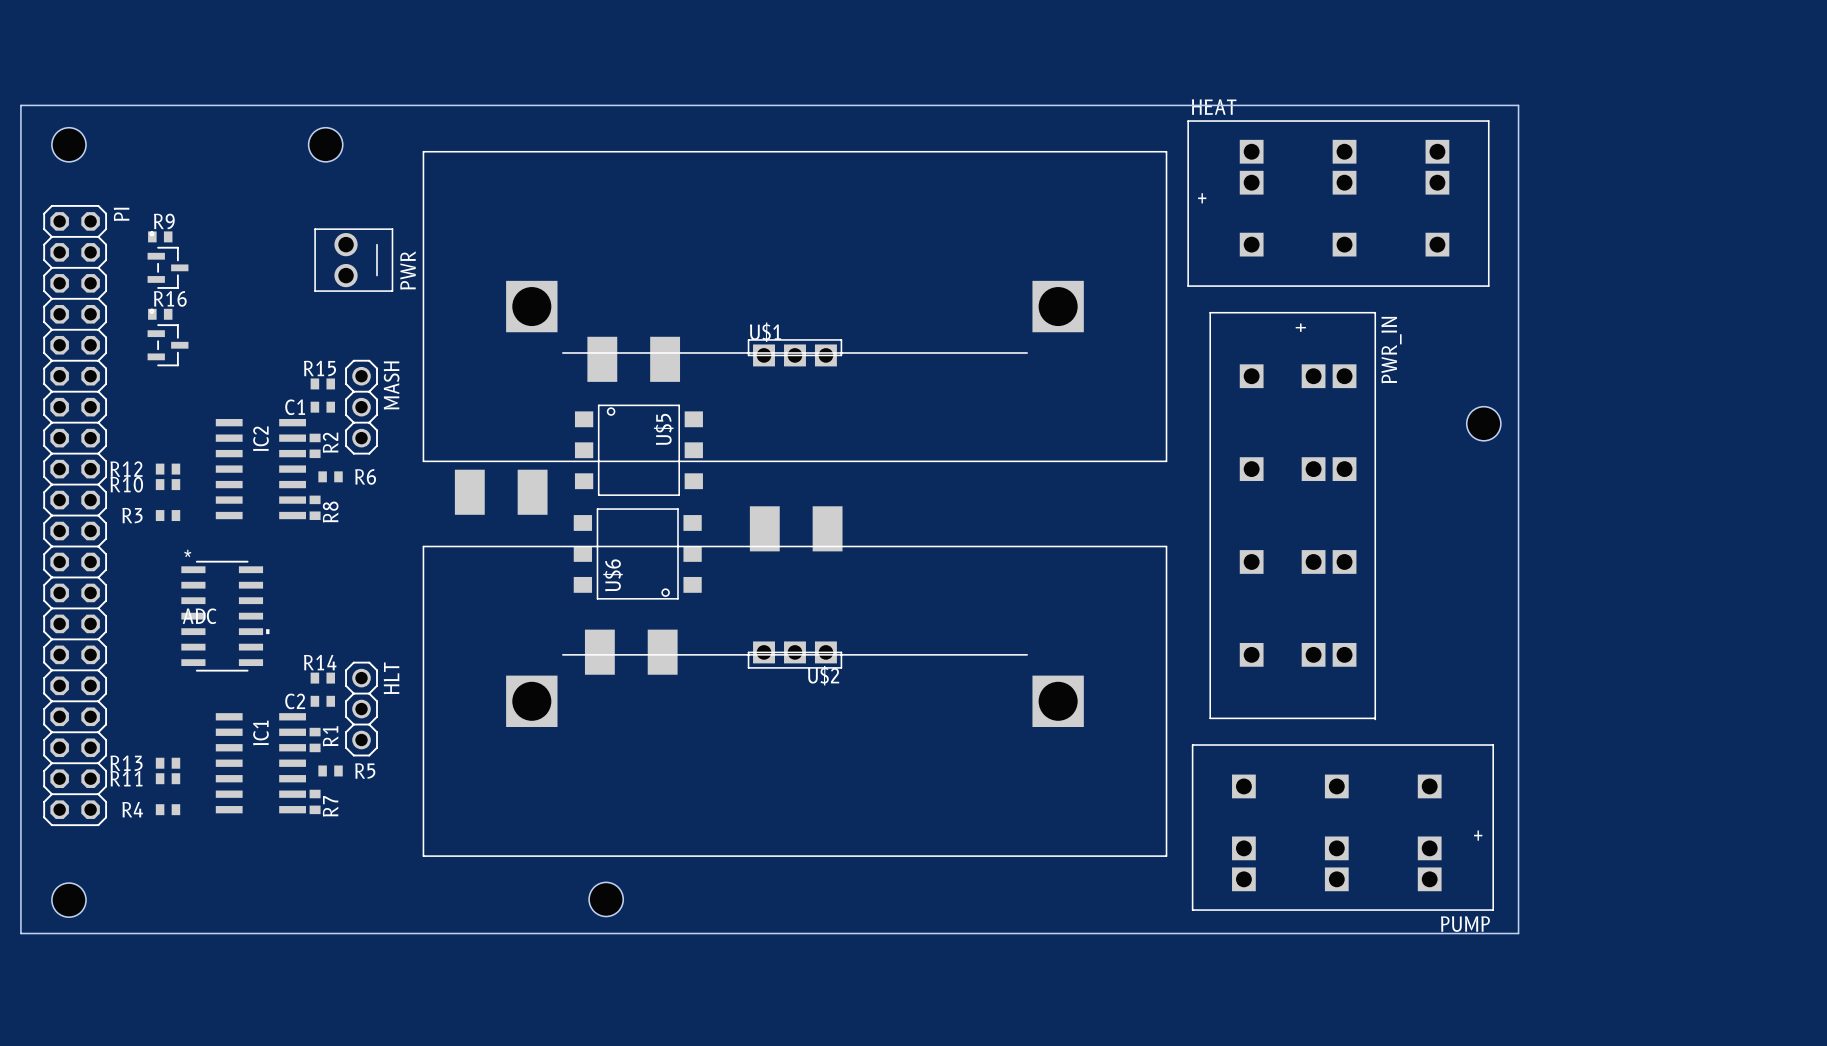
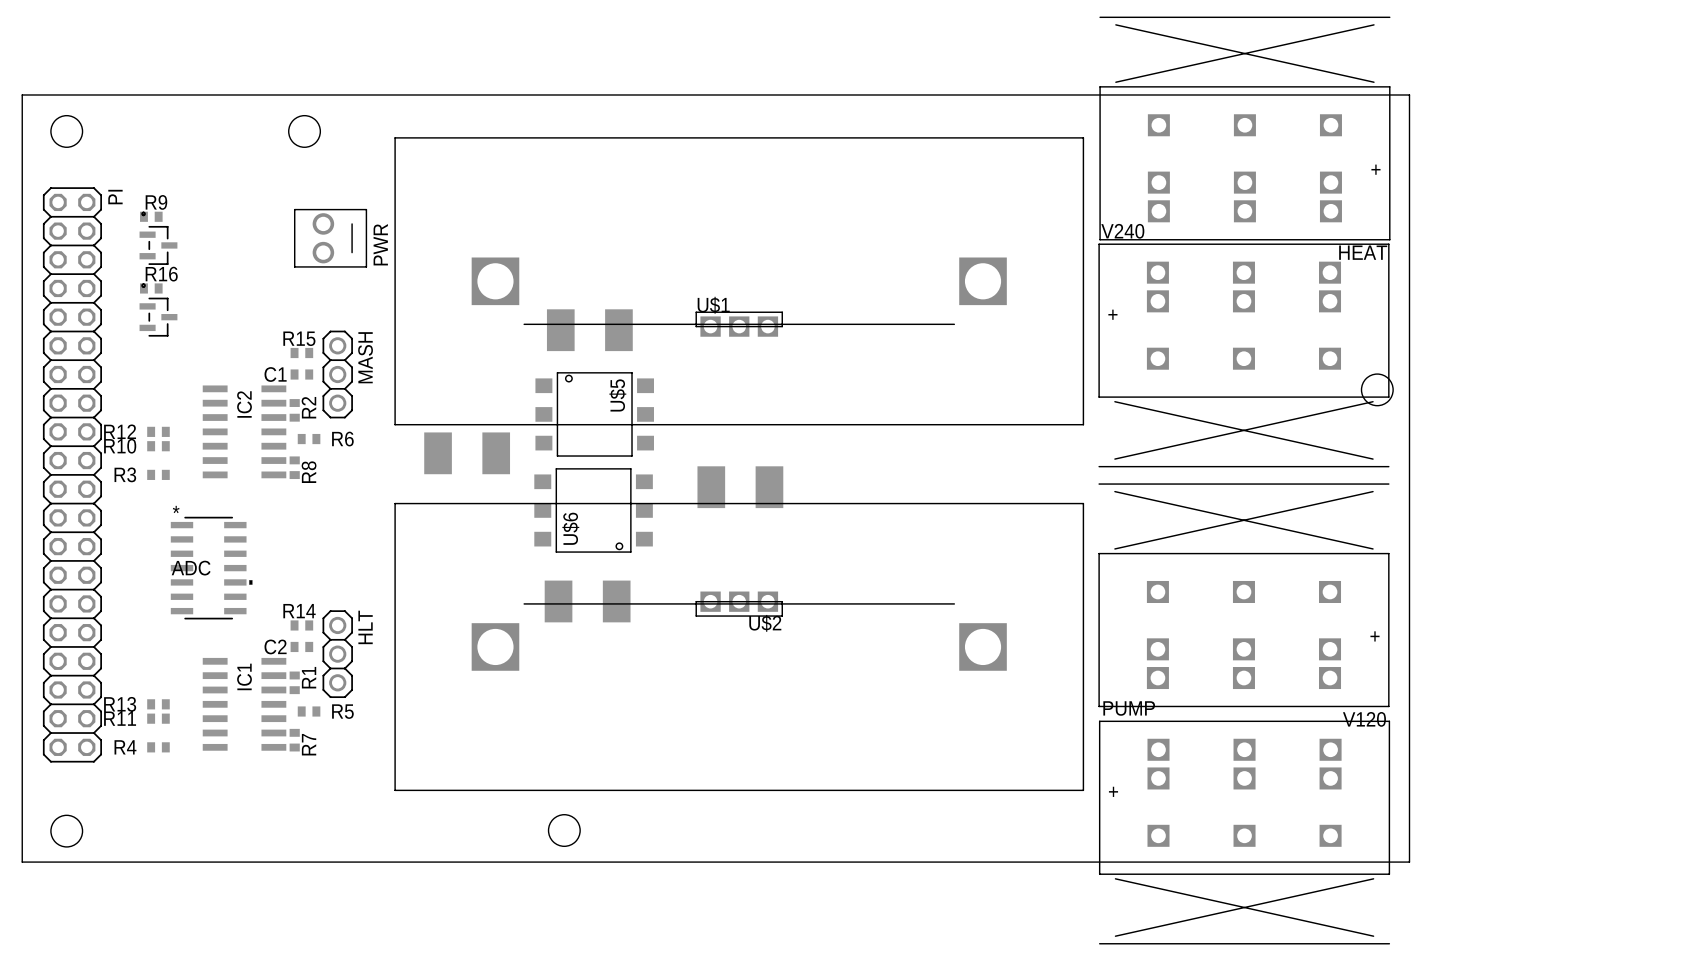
HEAT: none -> (1244, 128)
HEAT: (1338, 203) -> none
V240: none -> (1243, 355)
PWR_IN: (1292, 516) -> none
V120: none -> (1243, 595)
PUMP: (1342, 827) -> none
PUMP: none -> (1244, 832)

